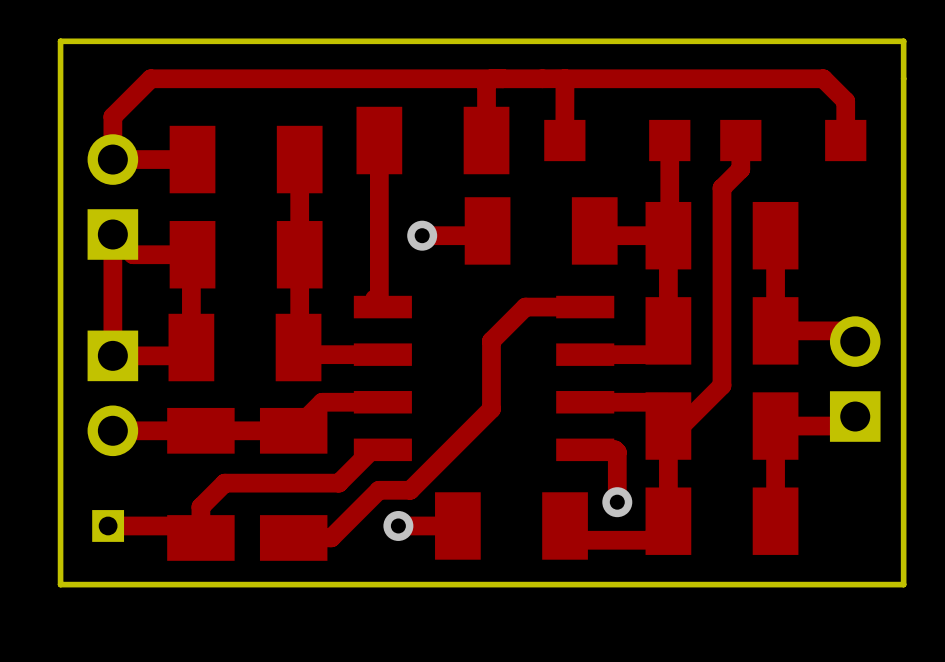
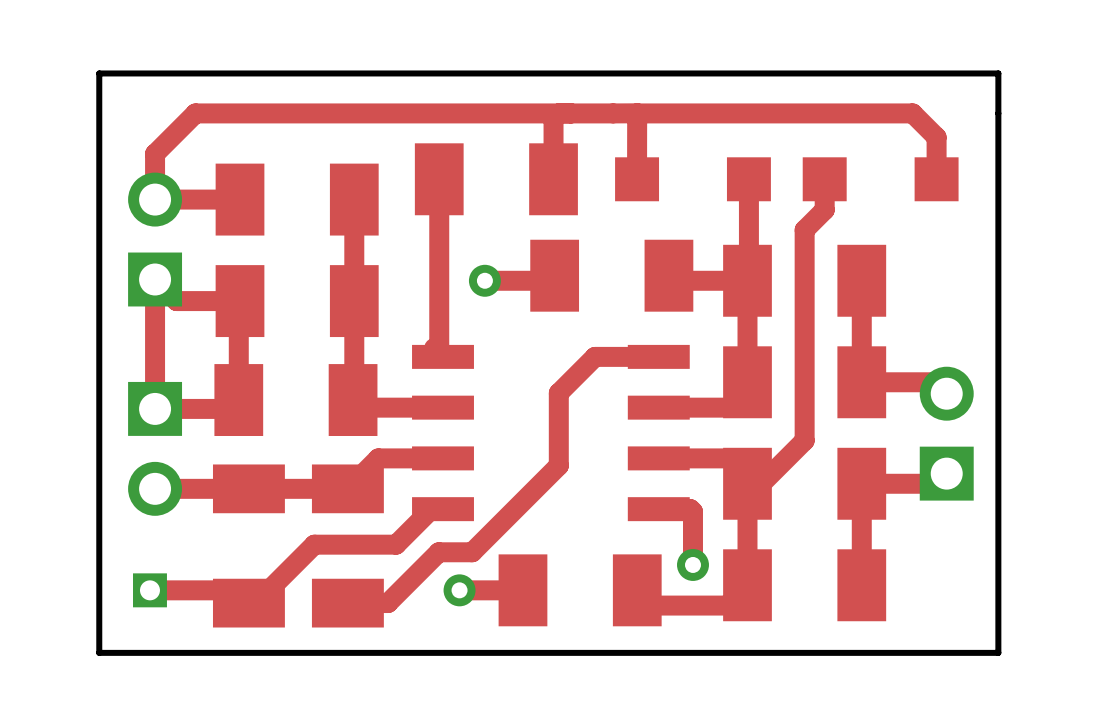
top track: (262, 483) (224, 483) (200, 506) (200, 537) -> (314, 544) (255, 603) (248, 603)

